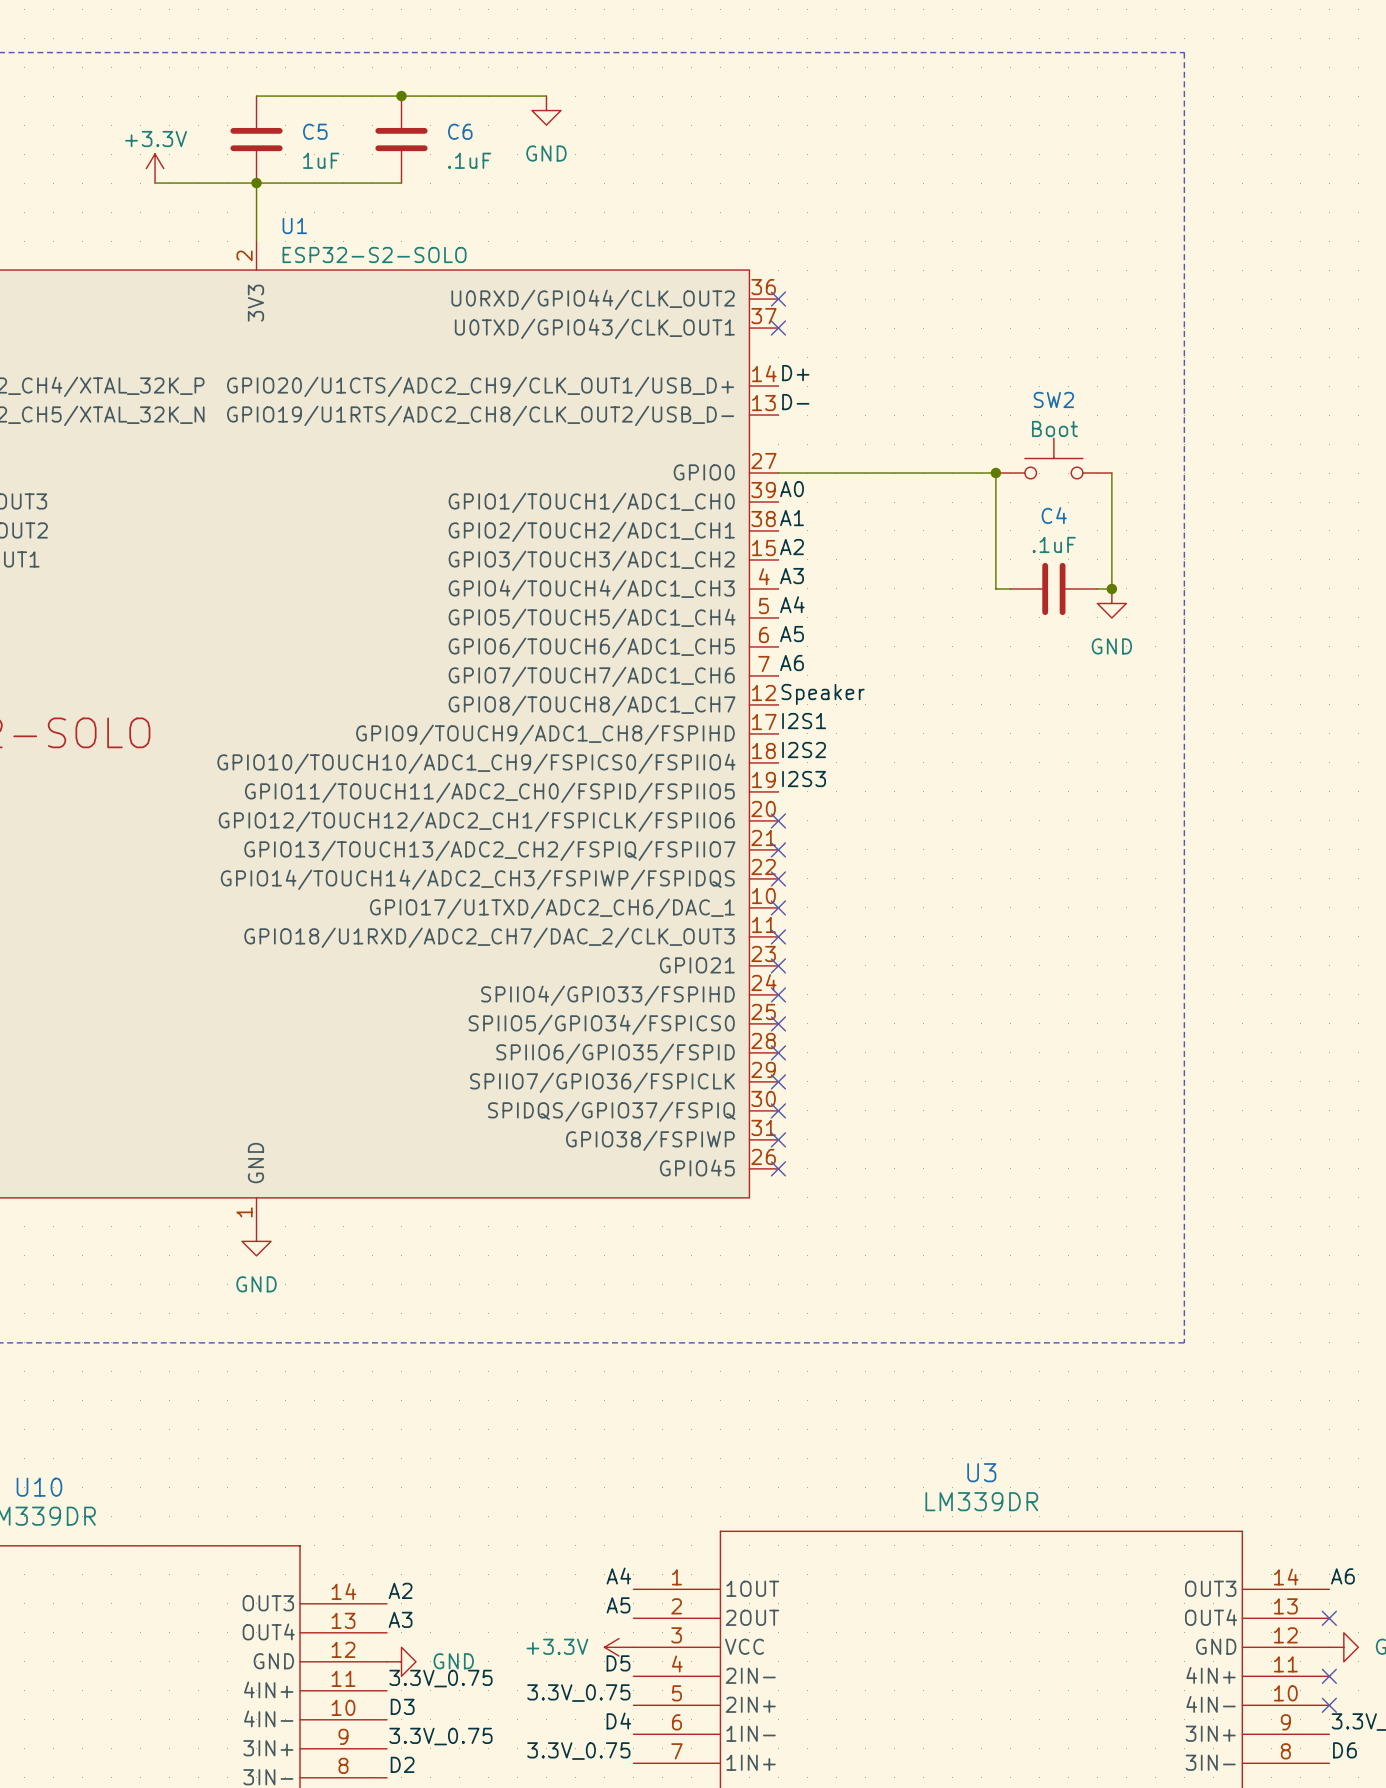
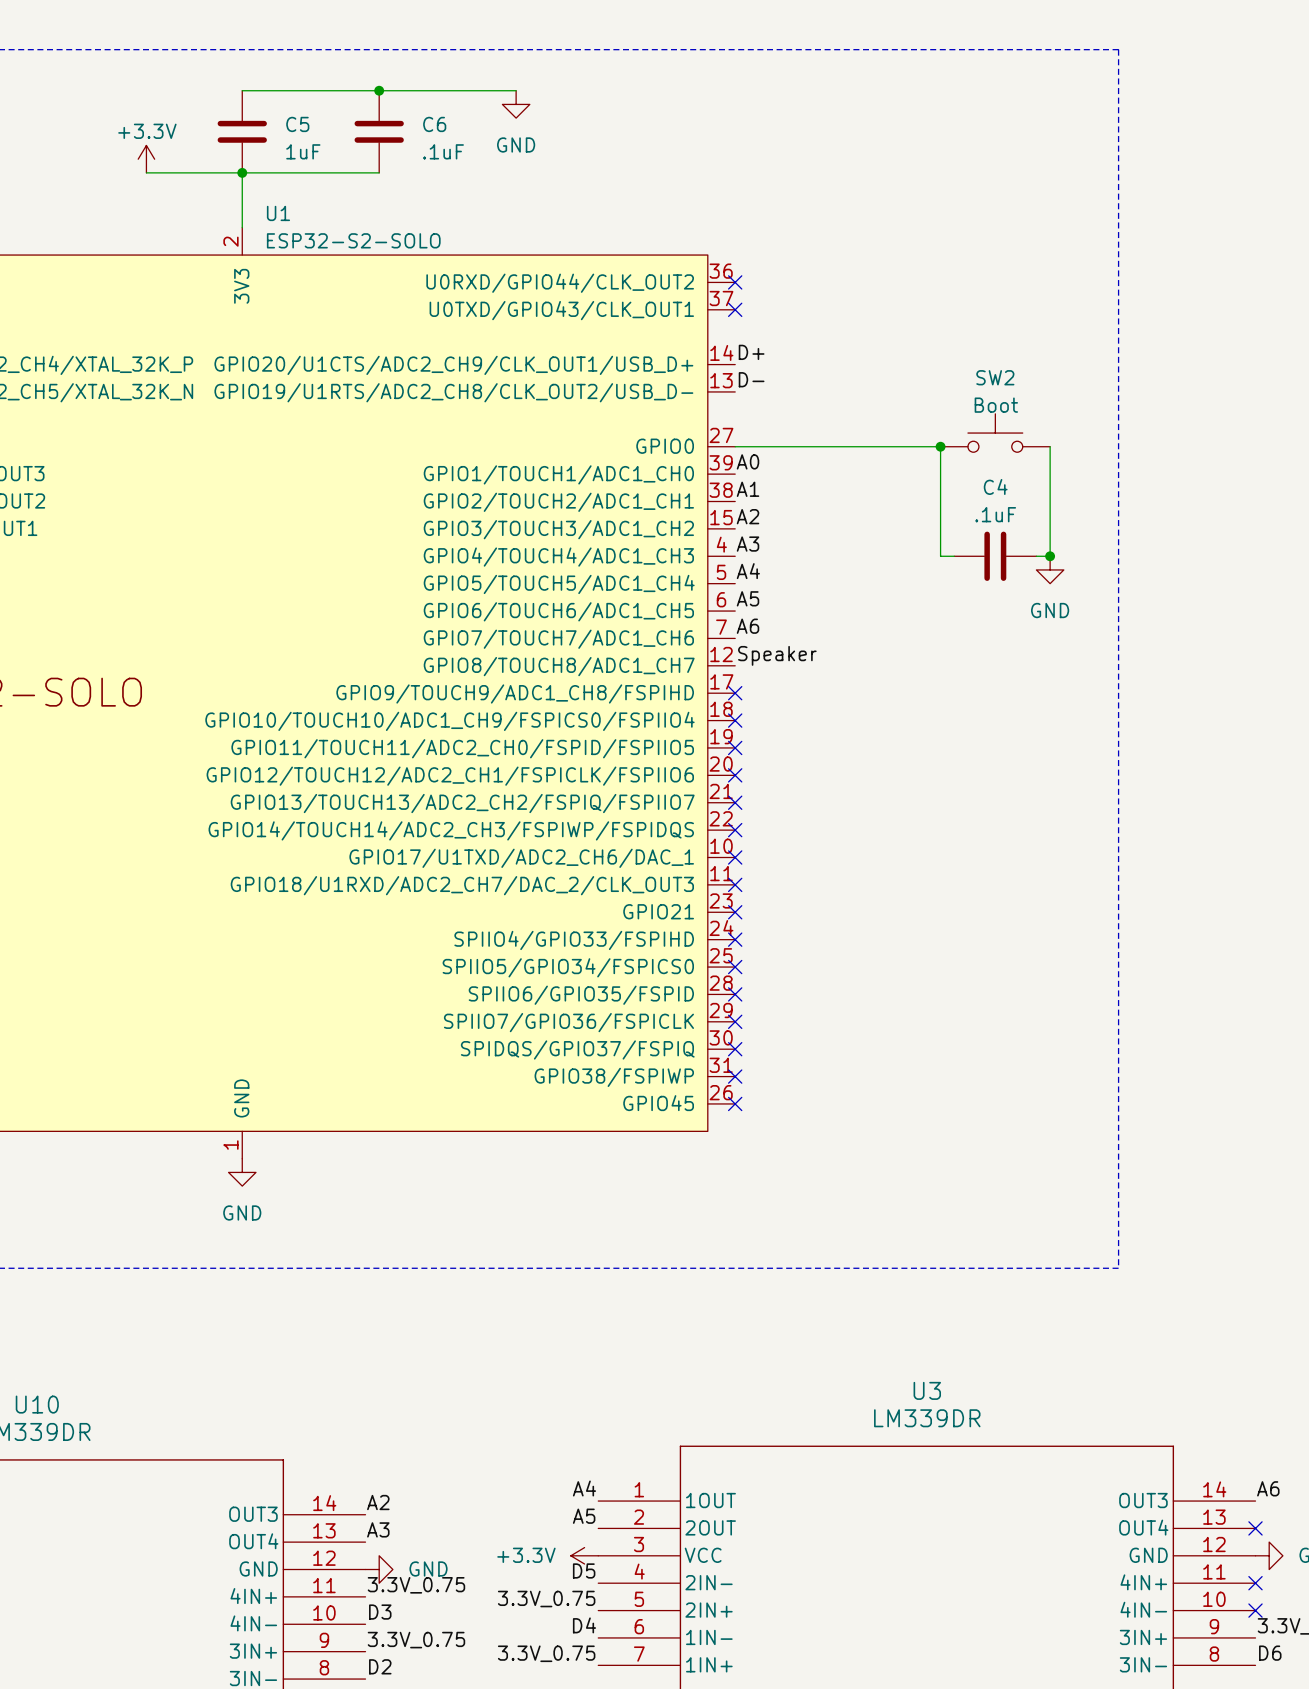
label: I2S1 (804, 721) -> none
no-connect mark: none -> (735, 693)
label: I2S2 (804, 750) -> none
no-connect mark: none -> (735, 720)
label: I2S3 (804, 779) -> none
no-connect mark: none -> (735, 747)

